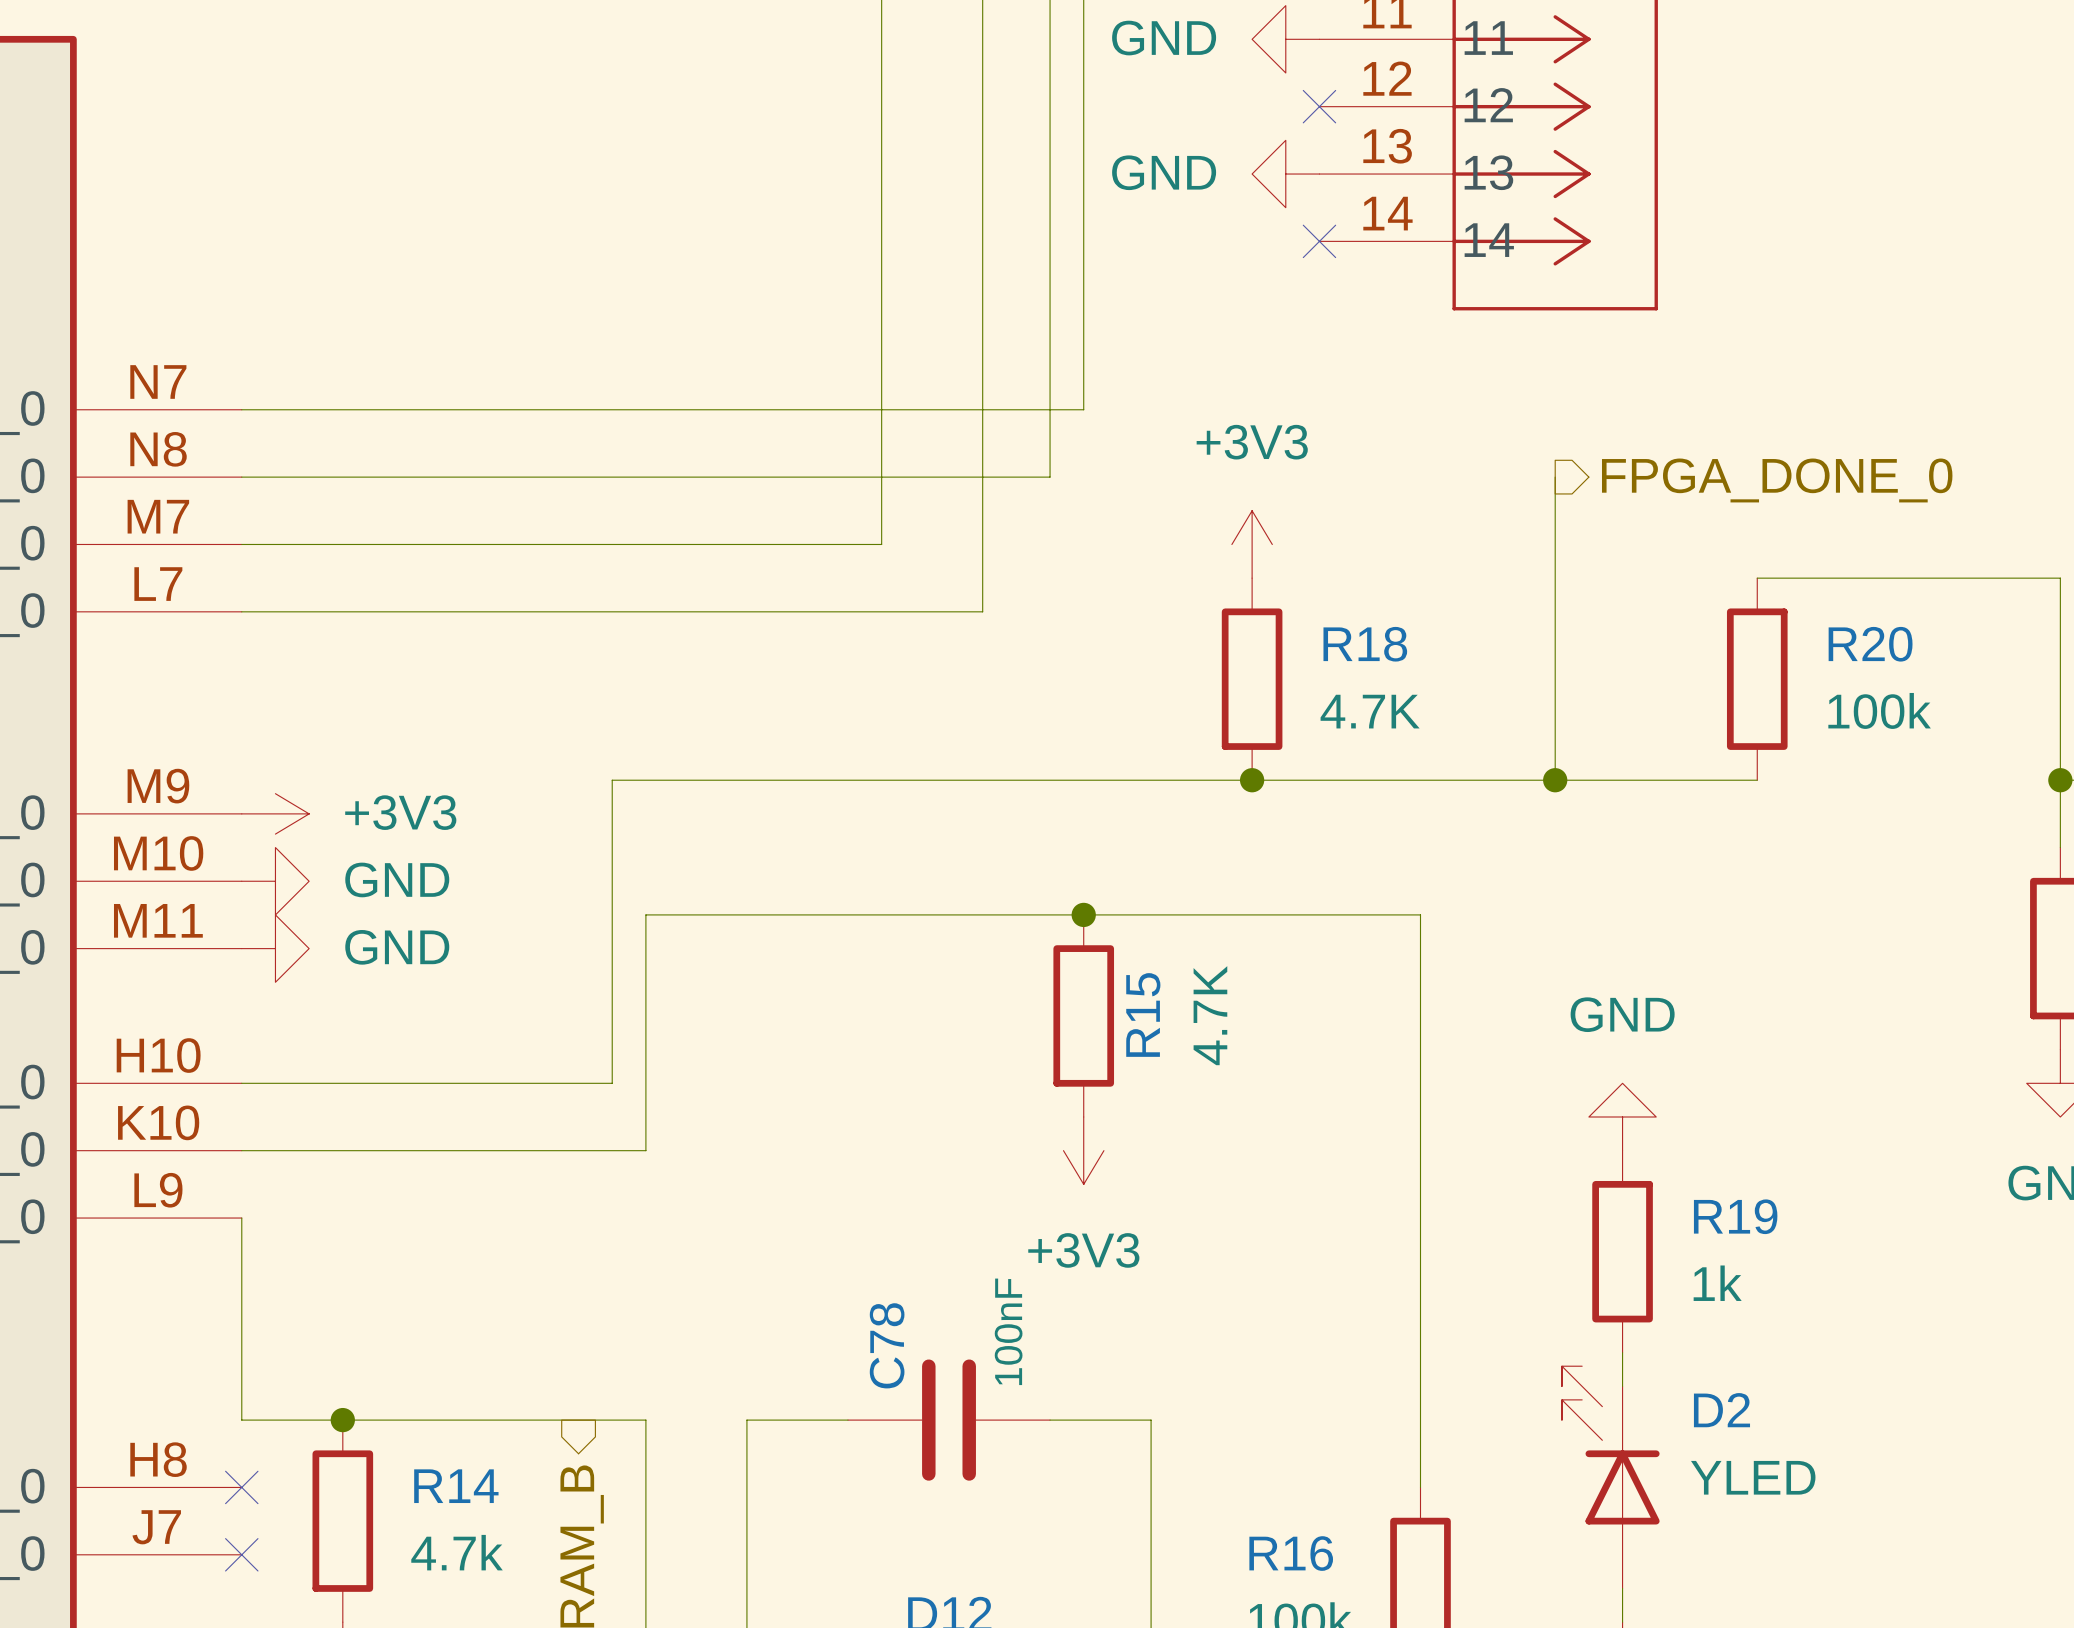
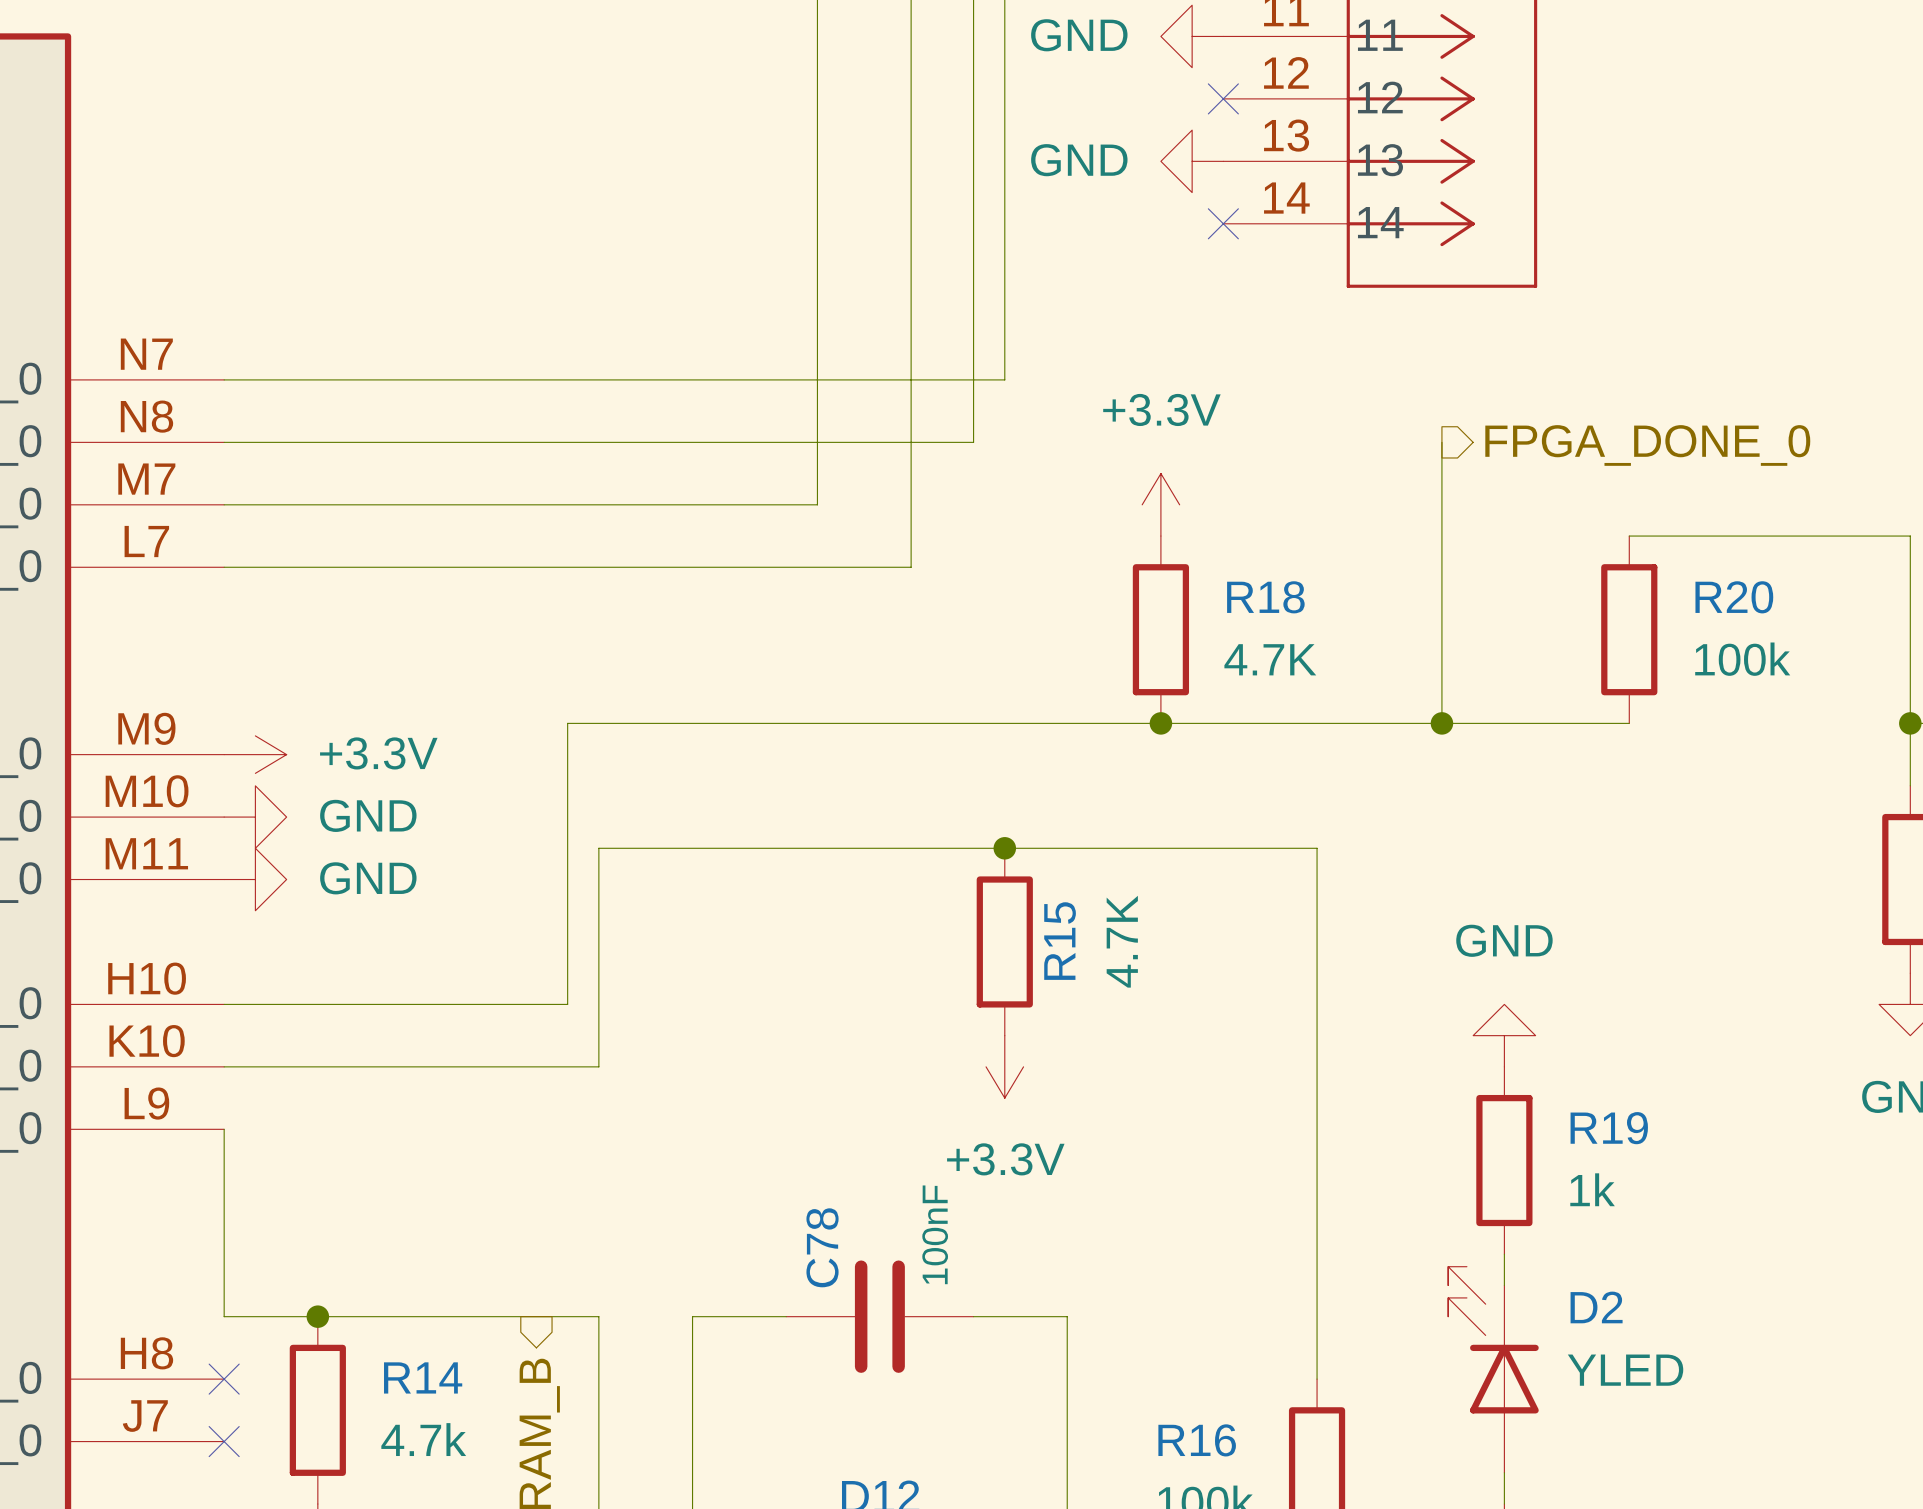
power symbol: +3V3 (1252, 544) -> +3.3V (1160, 504)
power symbol: +3V3 (275, 813) -> +3.3V (255, 754)
power symbol: +3V3 (1083, 1150) -> +3.3V (1004, 1066)

